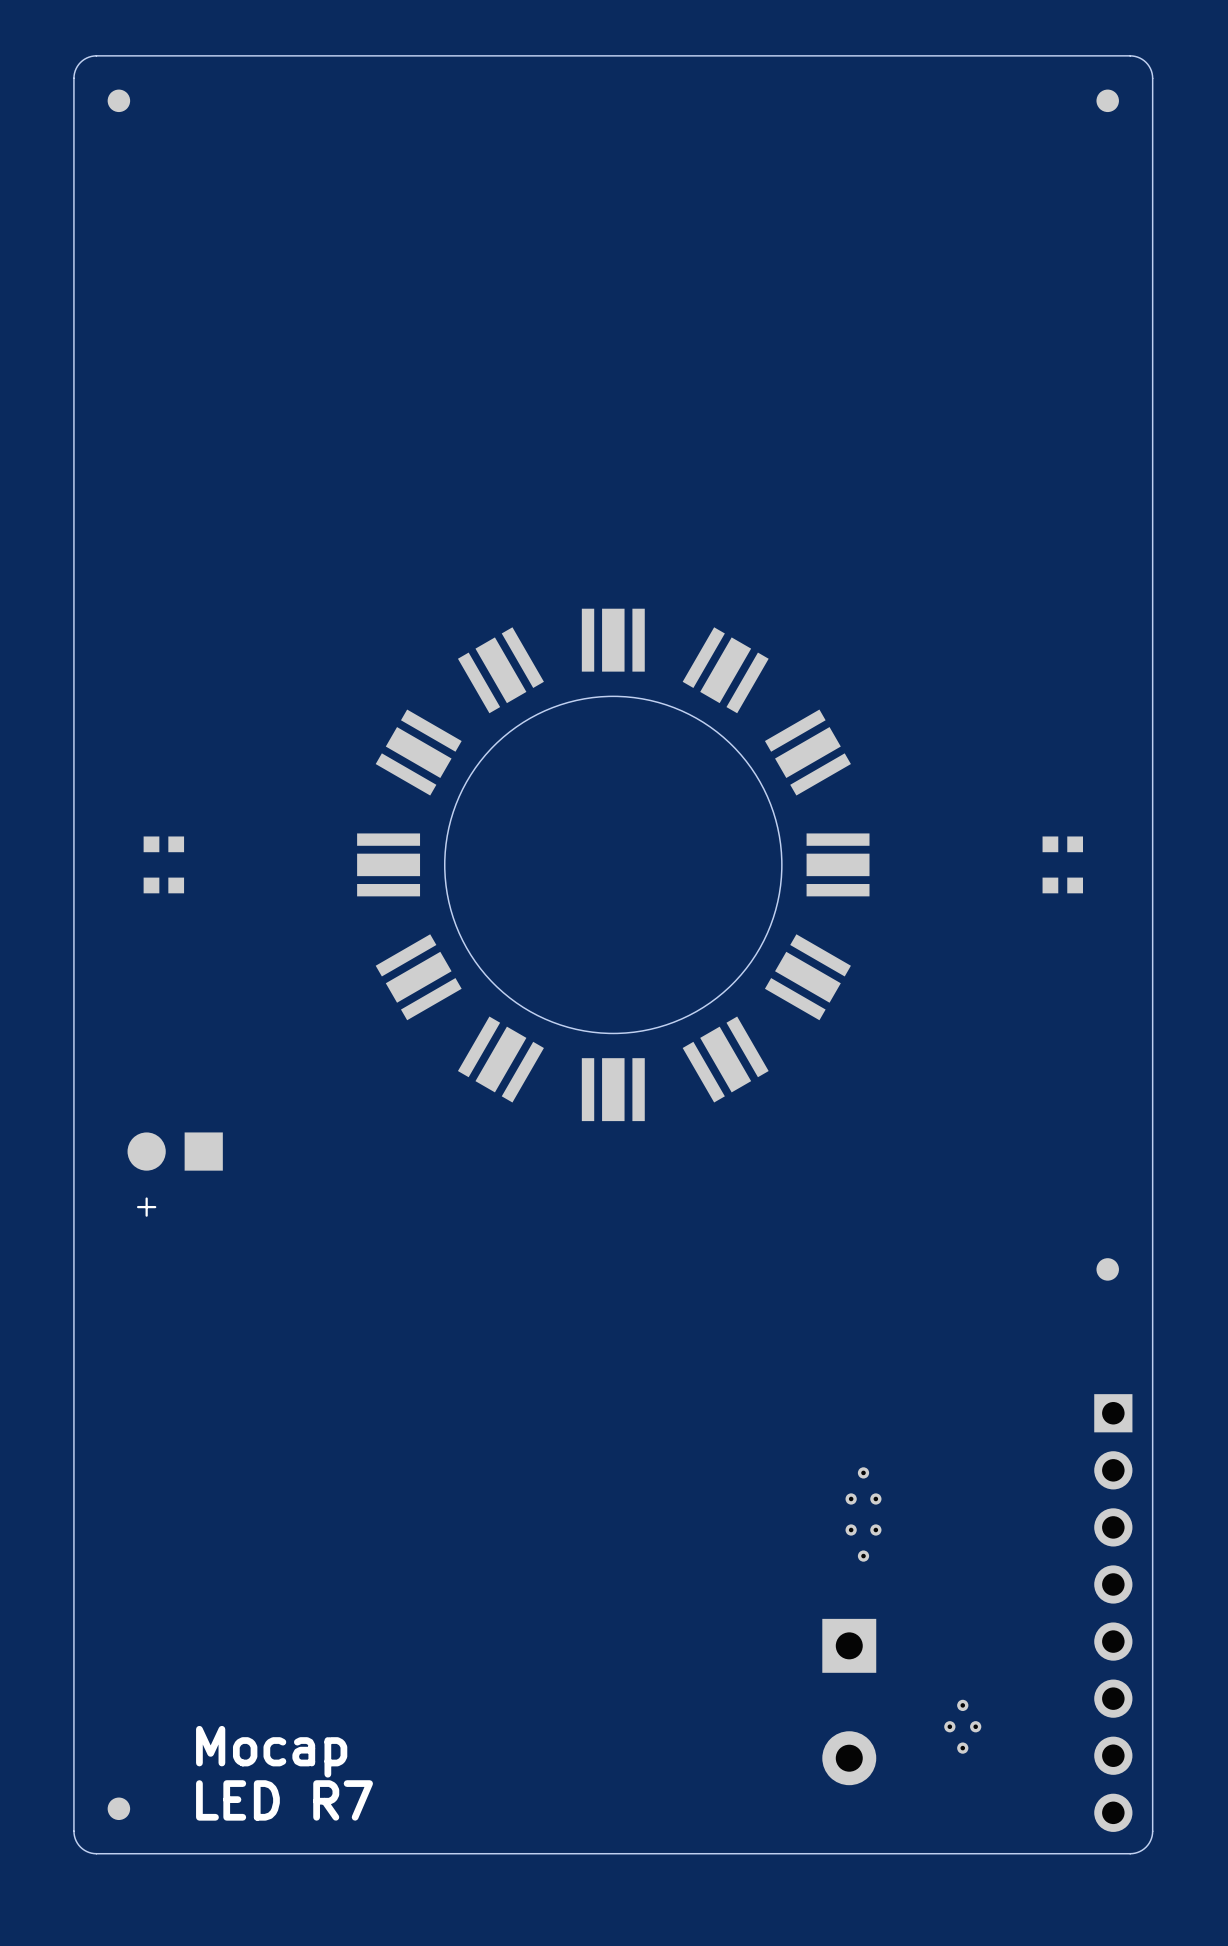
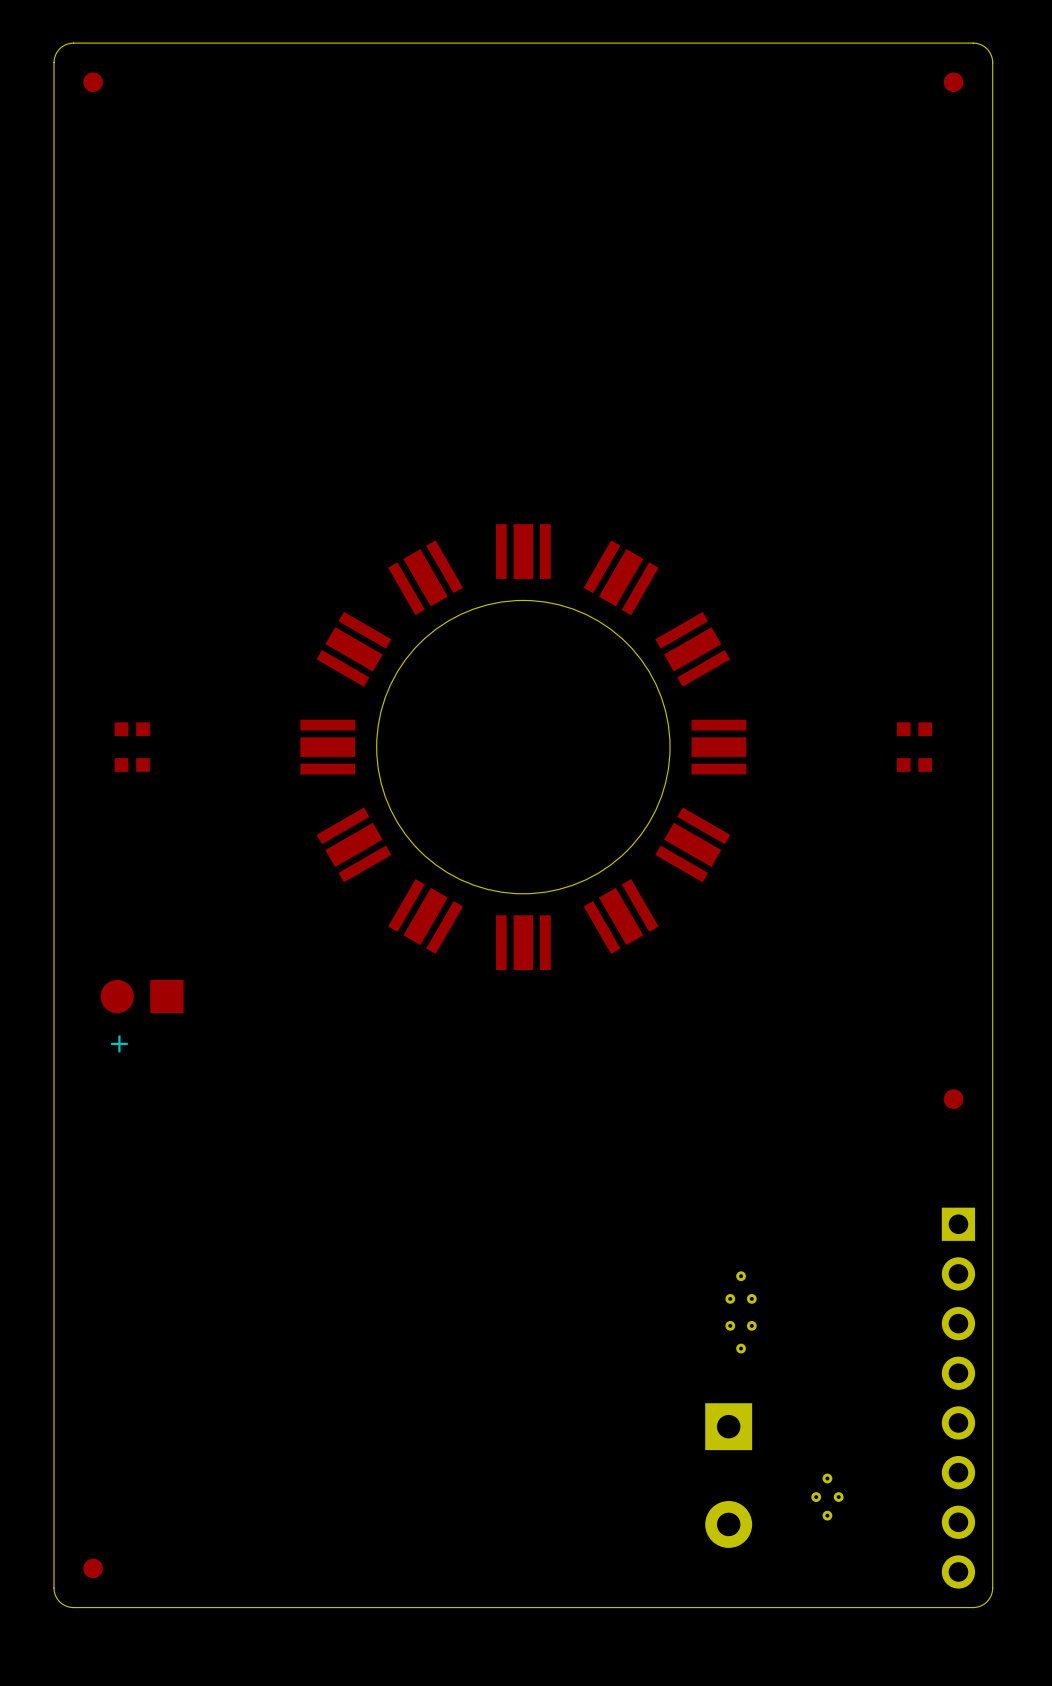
text: Mocap (271, 1751) -> none
text: LED R7 (284, 1800) -> none

